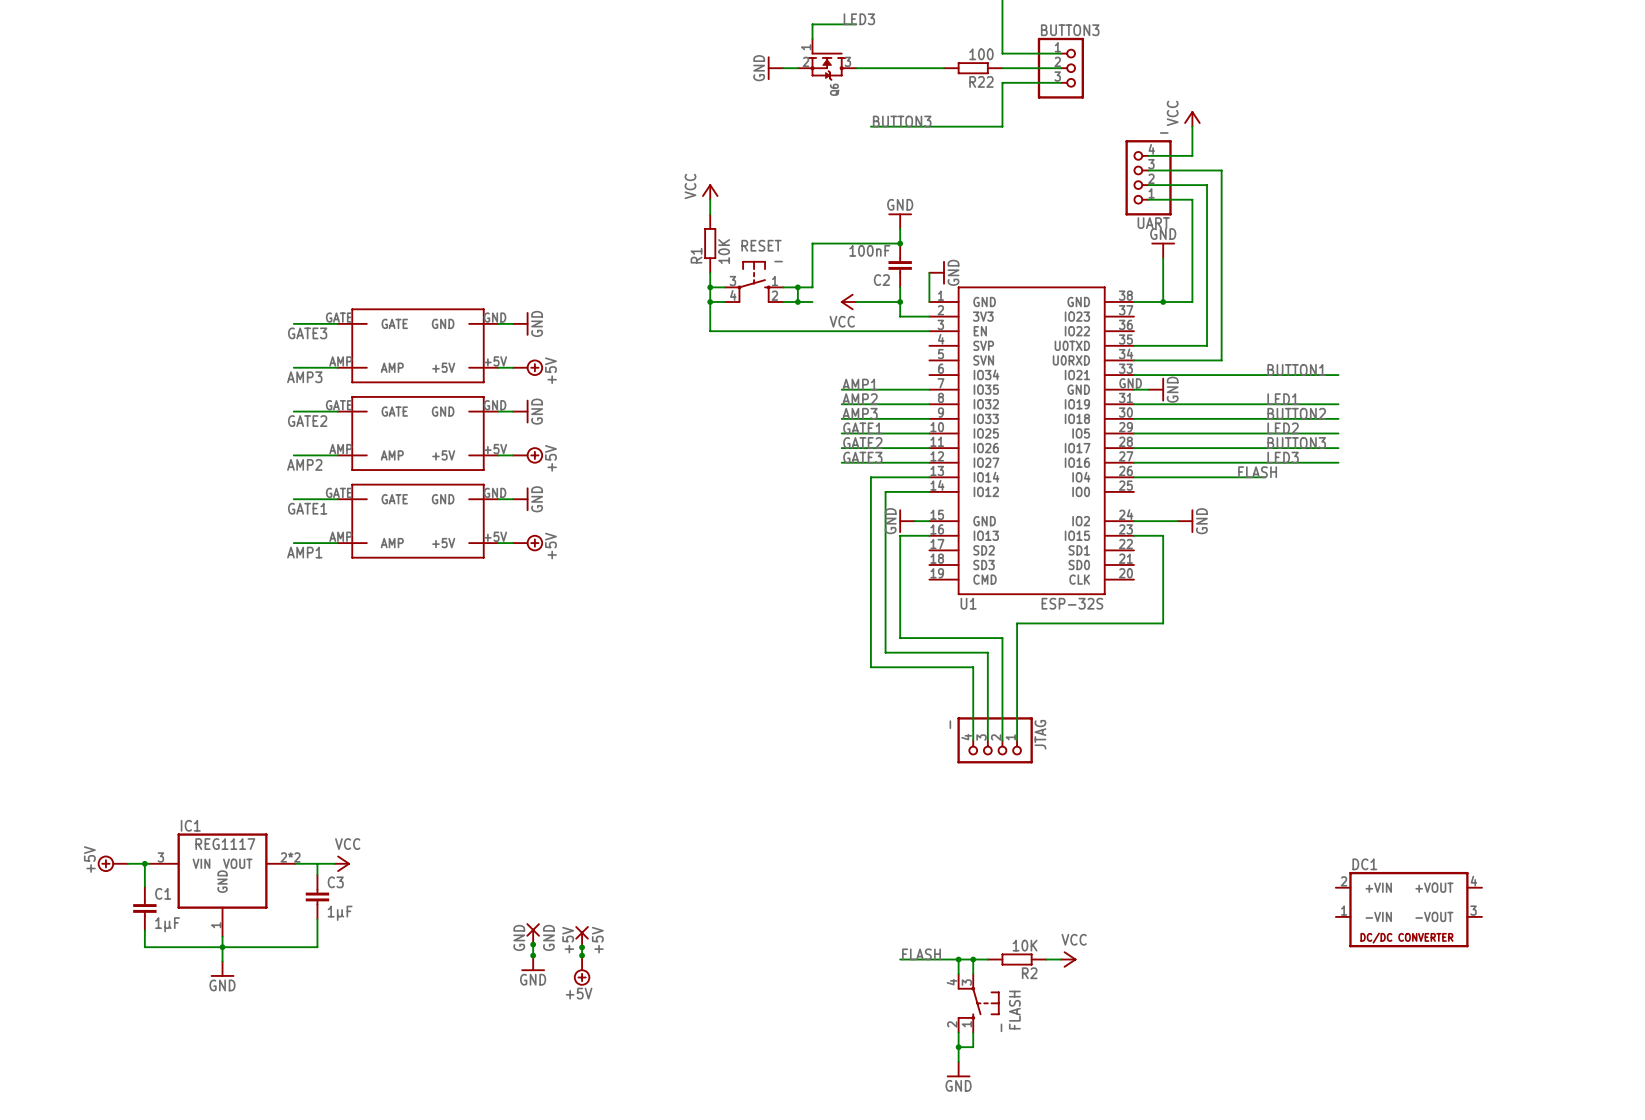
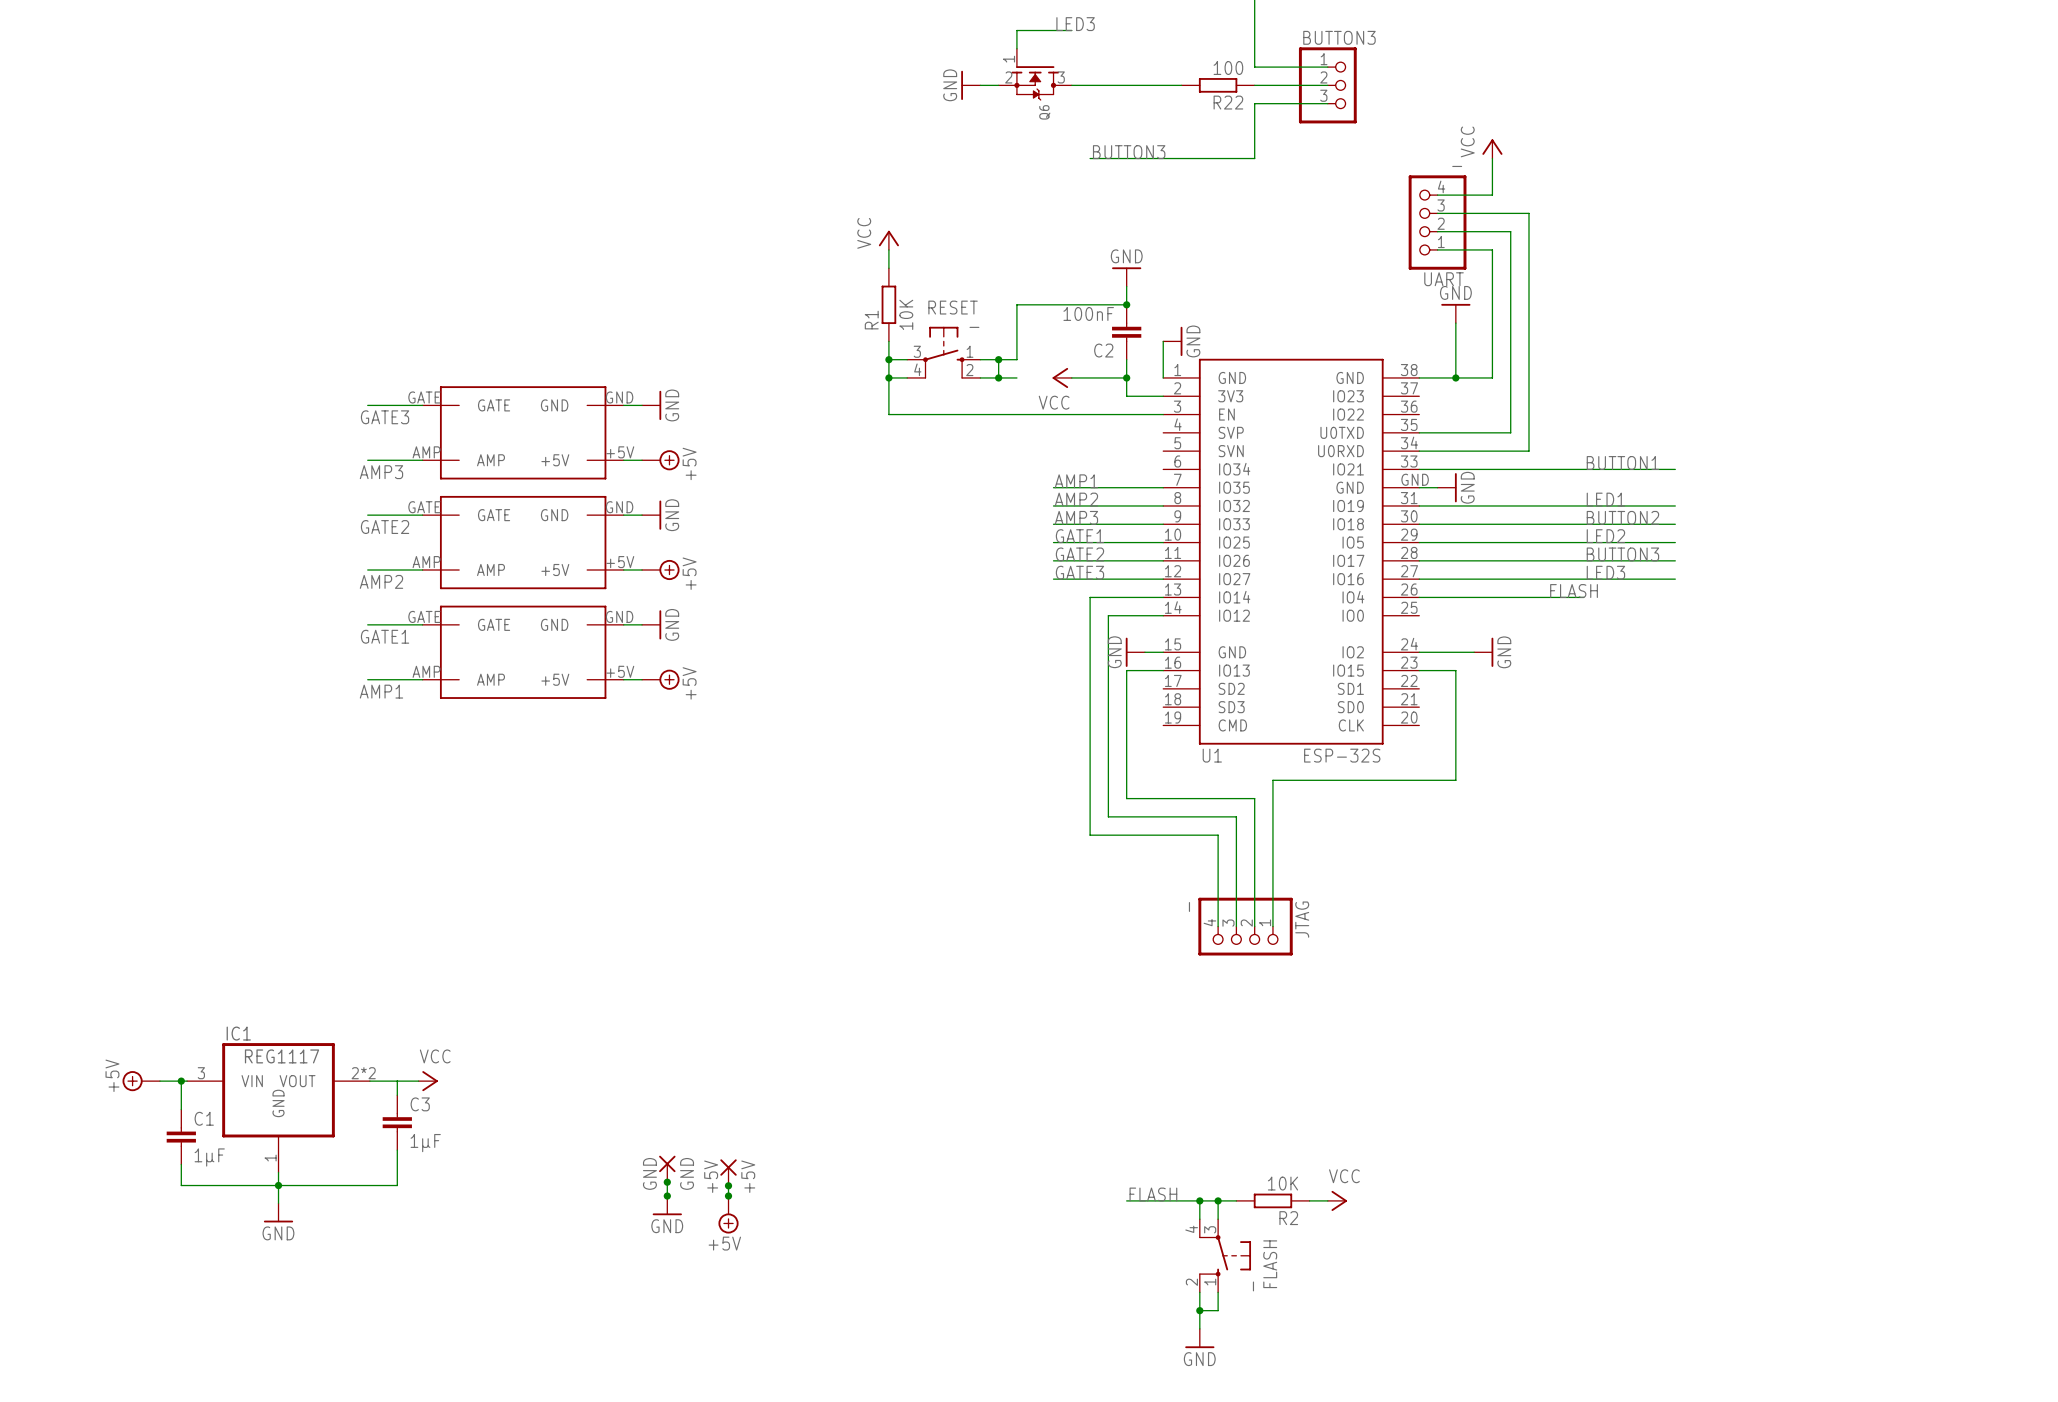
DC1: (1408, 909) -> none

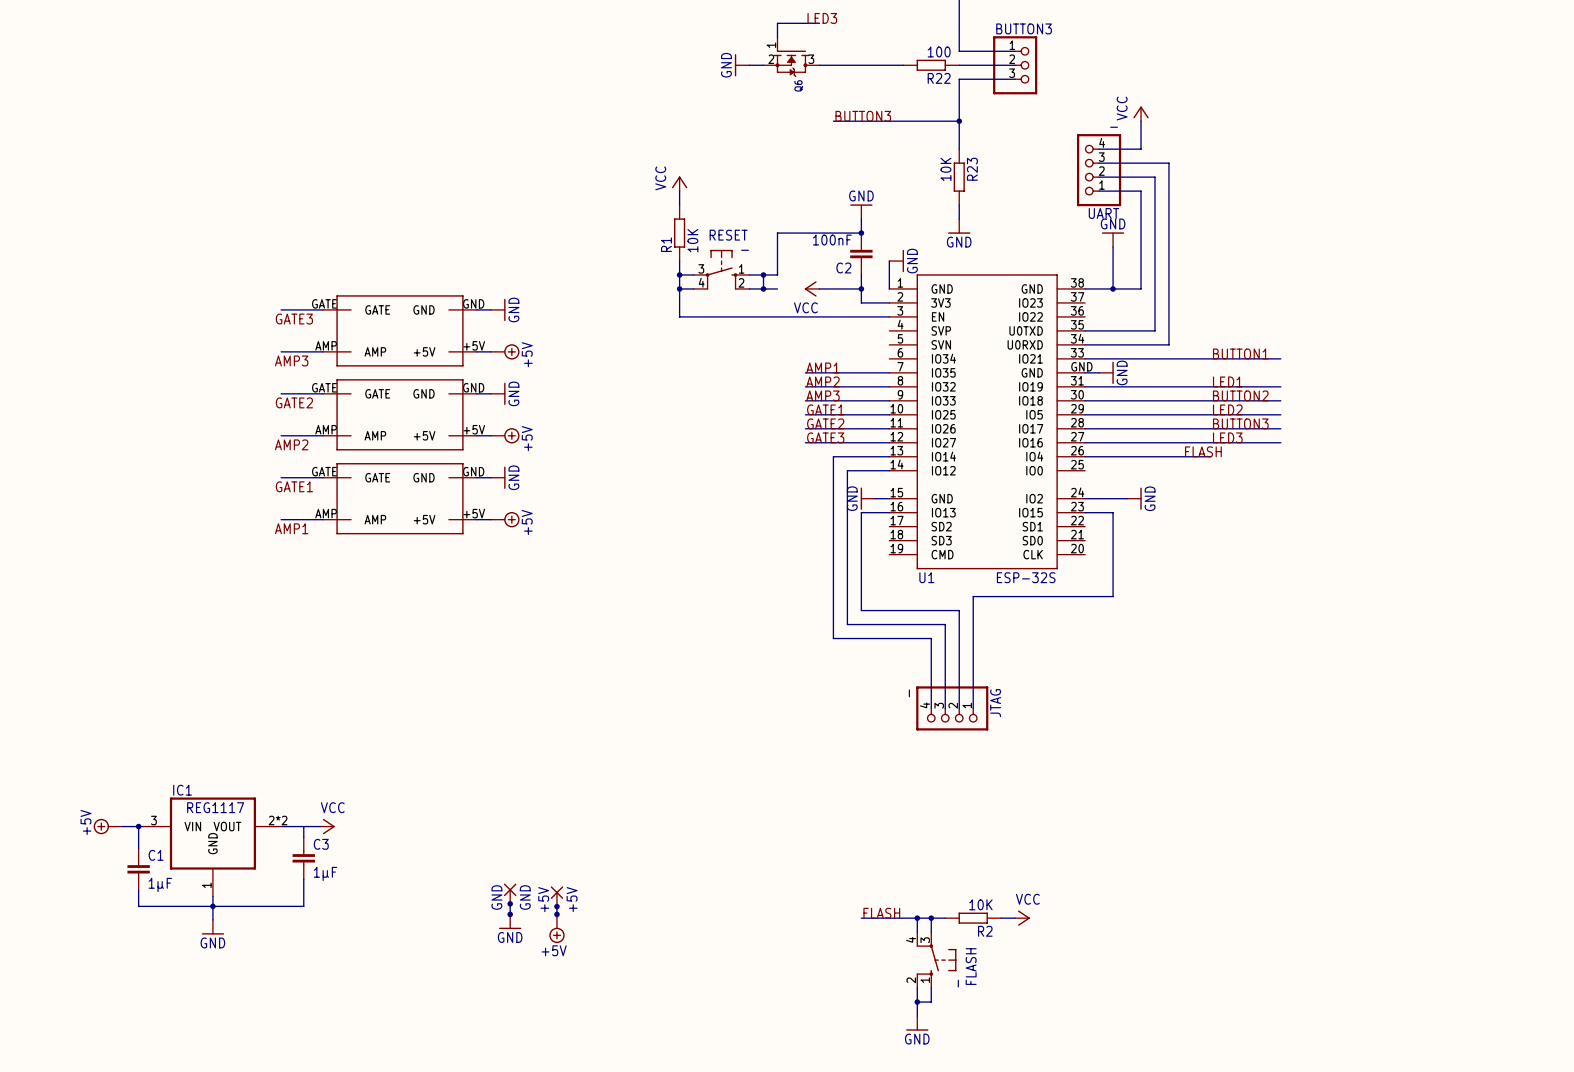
wire: none -> (959, 121) (959, 149)
junction: none -> (959, 121)
R23: none -> 10K (959, 177)
wire: none -> (959, 205) (959, 219)
power symbol: none -> GND (959, 226)

